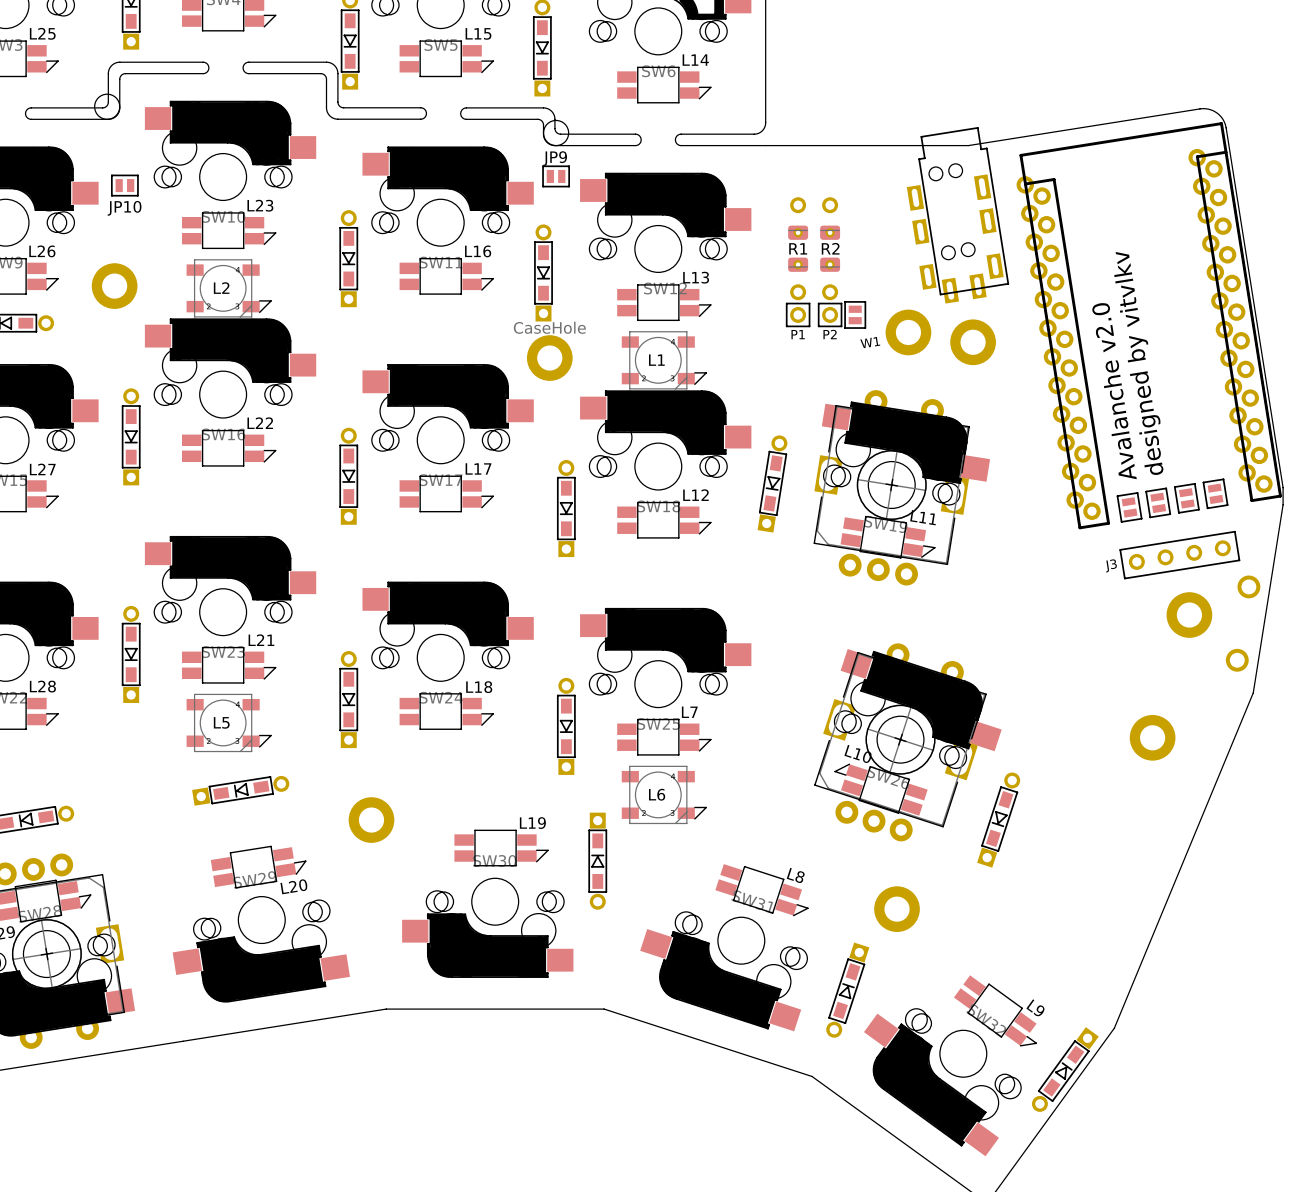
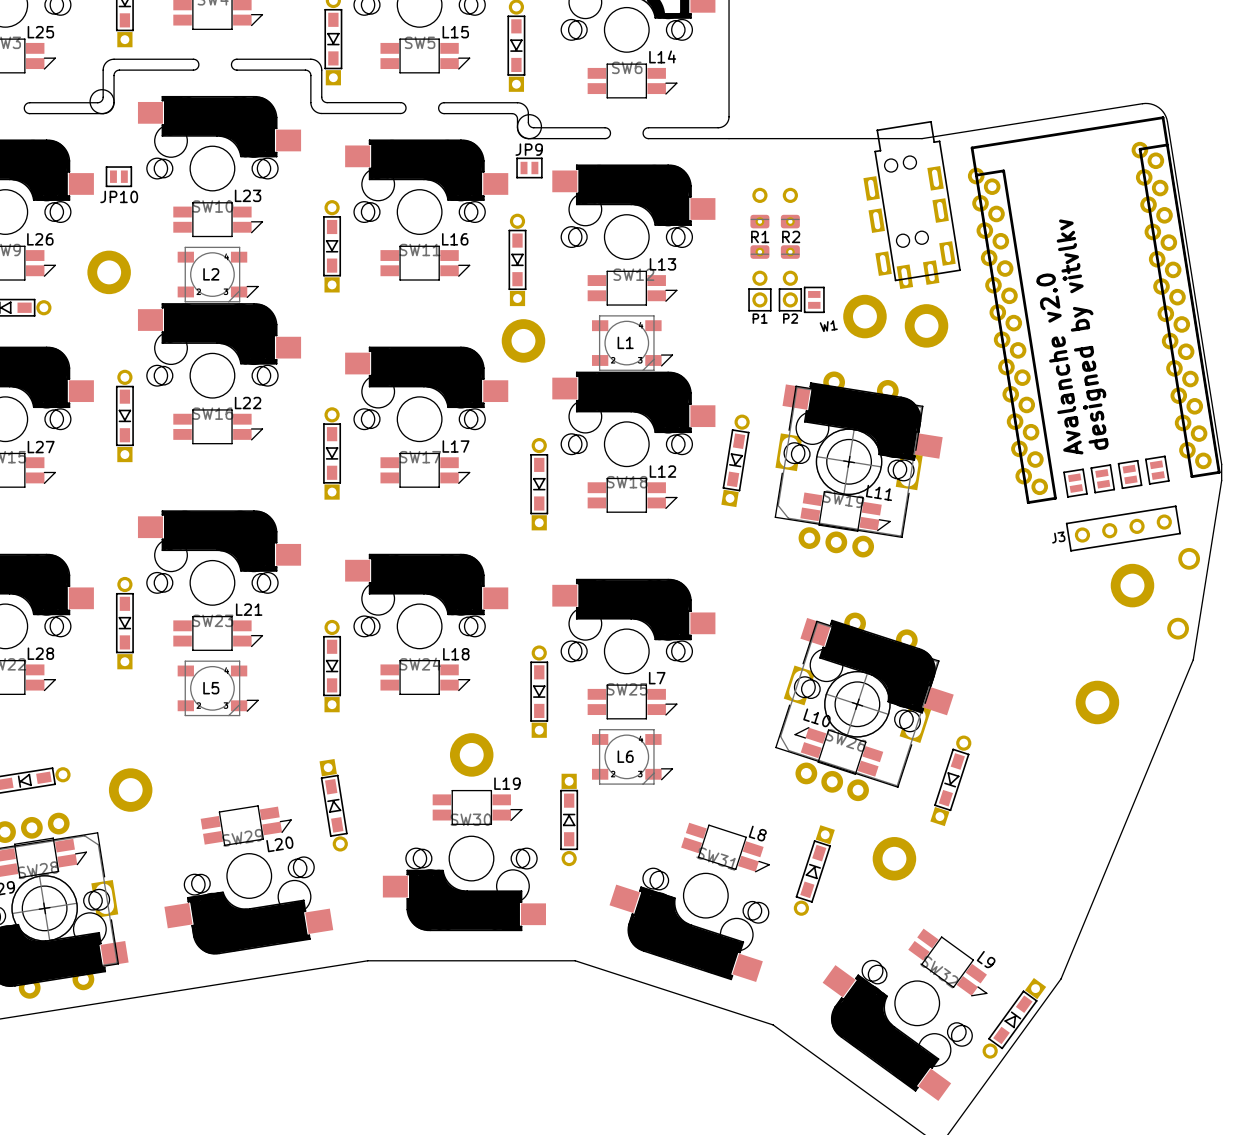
part value: CaseHole (549, 327) -> none
part rotation: 0° (240, 790) -> 90° clockwise (333, 805)
part position: (240, 790) -> (333, 805)
part: none -> (471, 754)
part: (371, 820) -> none
part: none -> (130, 790)
part position: (897, 909) -> (894, 858)
part position: (847, 990) -> (814, 870)

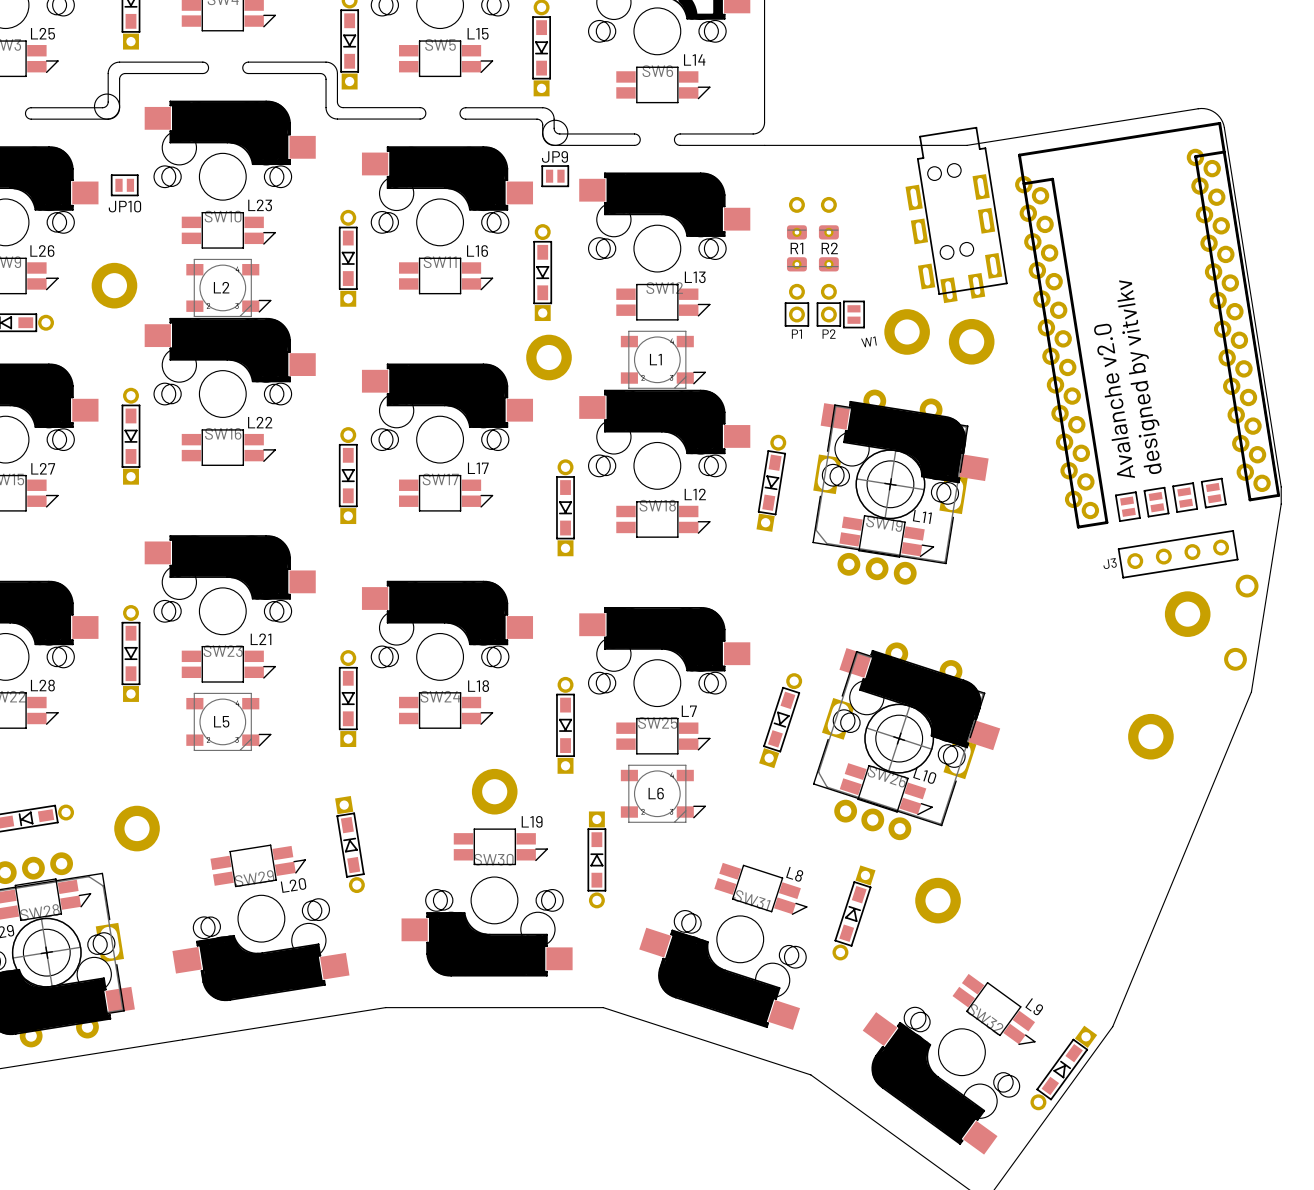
L10 name position: L10 (816, 717) -> L10 (924, 775)
L10 rotation: 0° (838, 751) -> 180° (886, 789)
part position: (950, 780) -> (780, 720)

